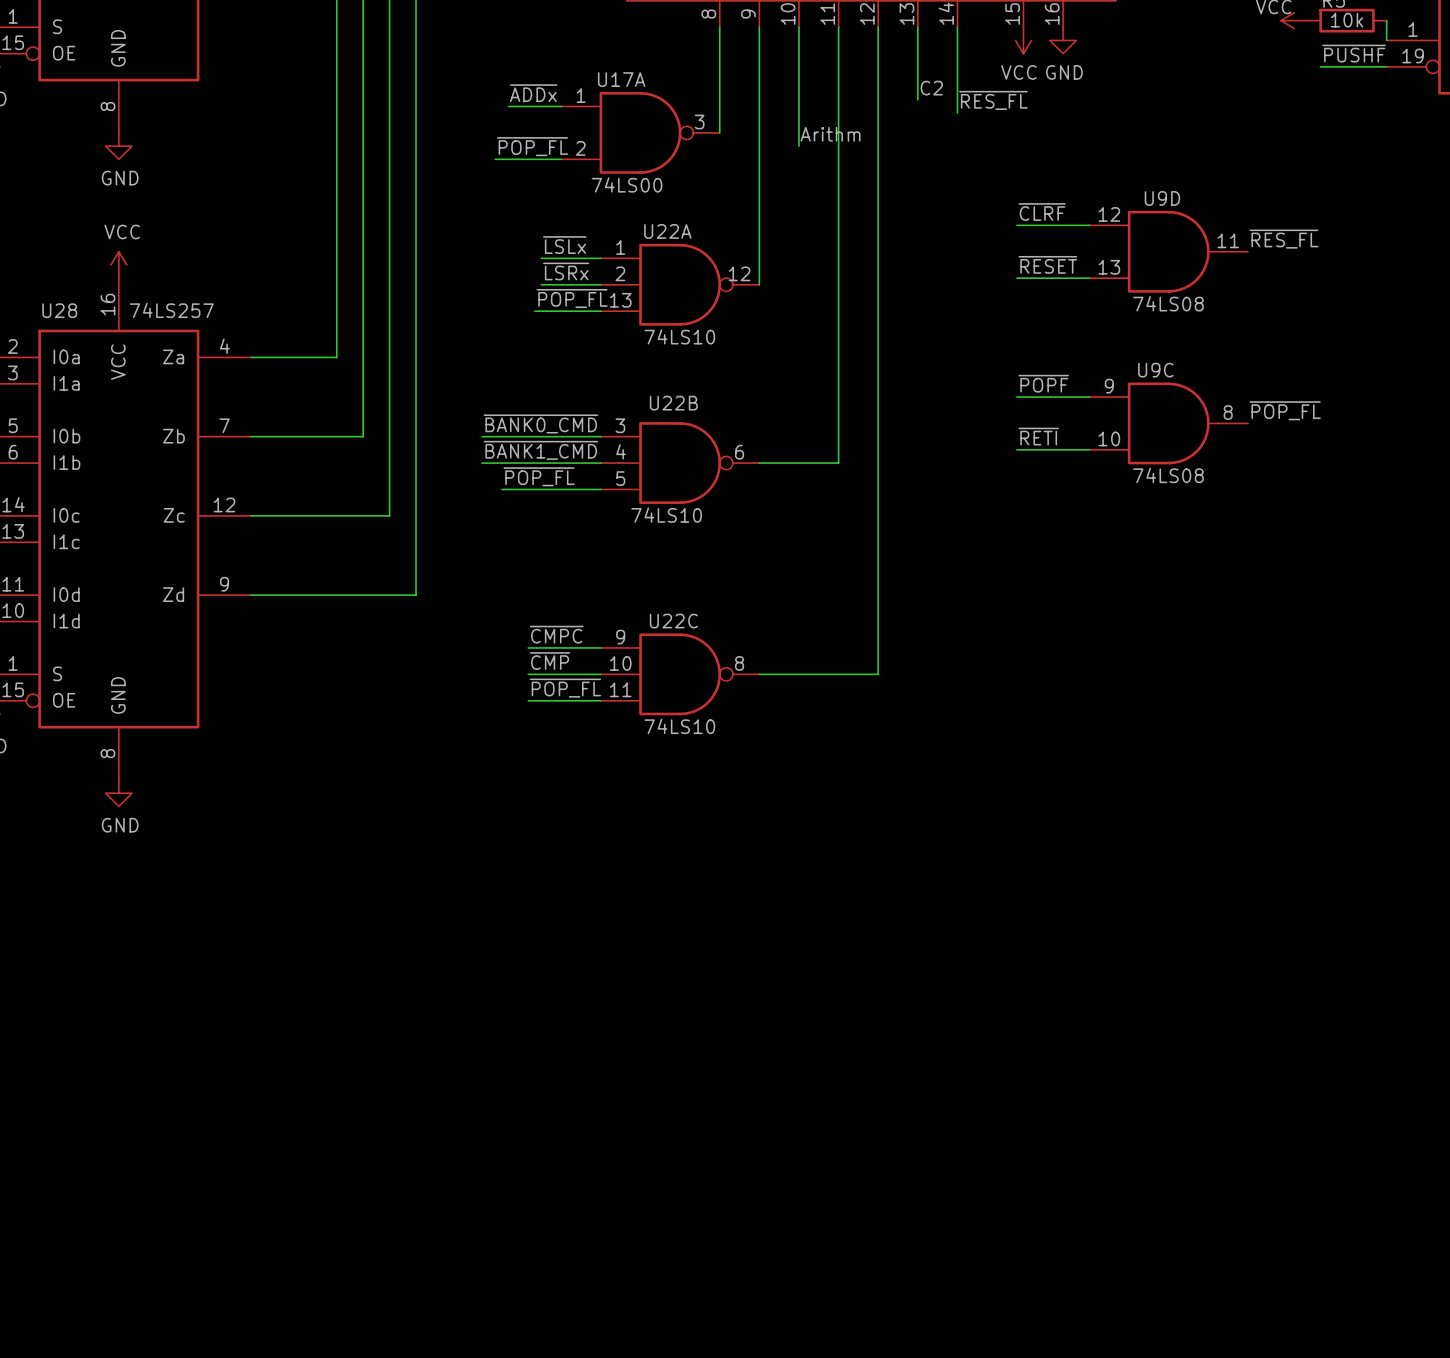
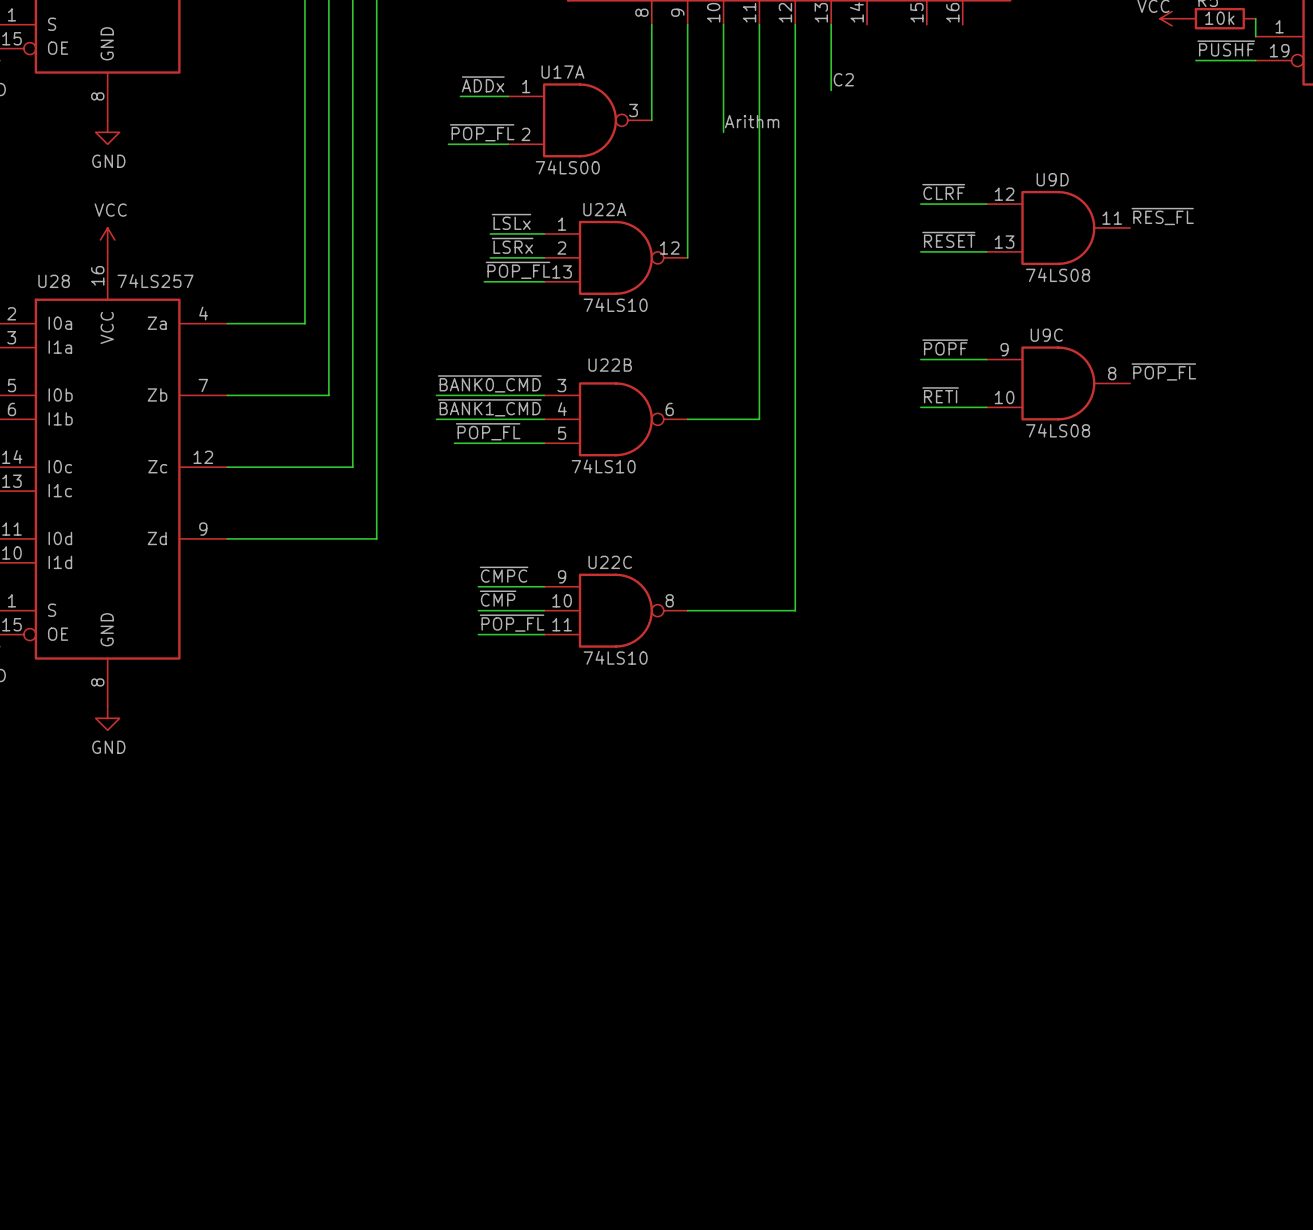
wire: (957, 27) (957, 113) -> none
power symbol: VCC (1023, 40) -> none
power symbol: GND (1063, 40) -> none
label: ~{RES_FL} (993, 100) -> none

